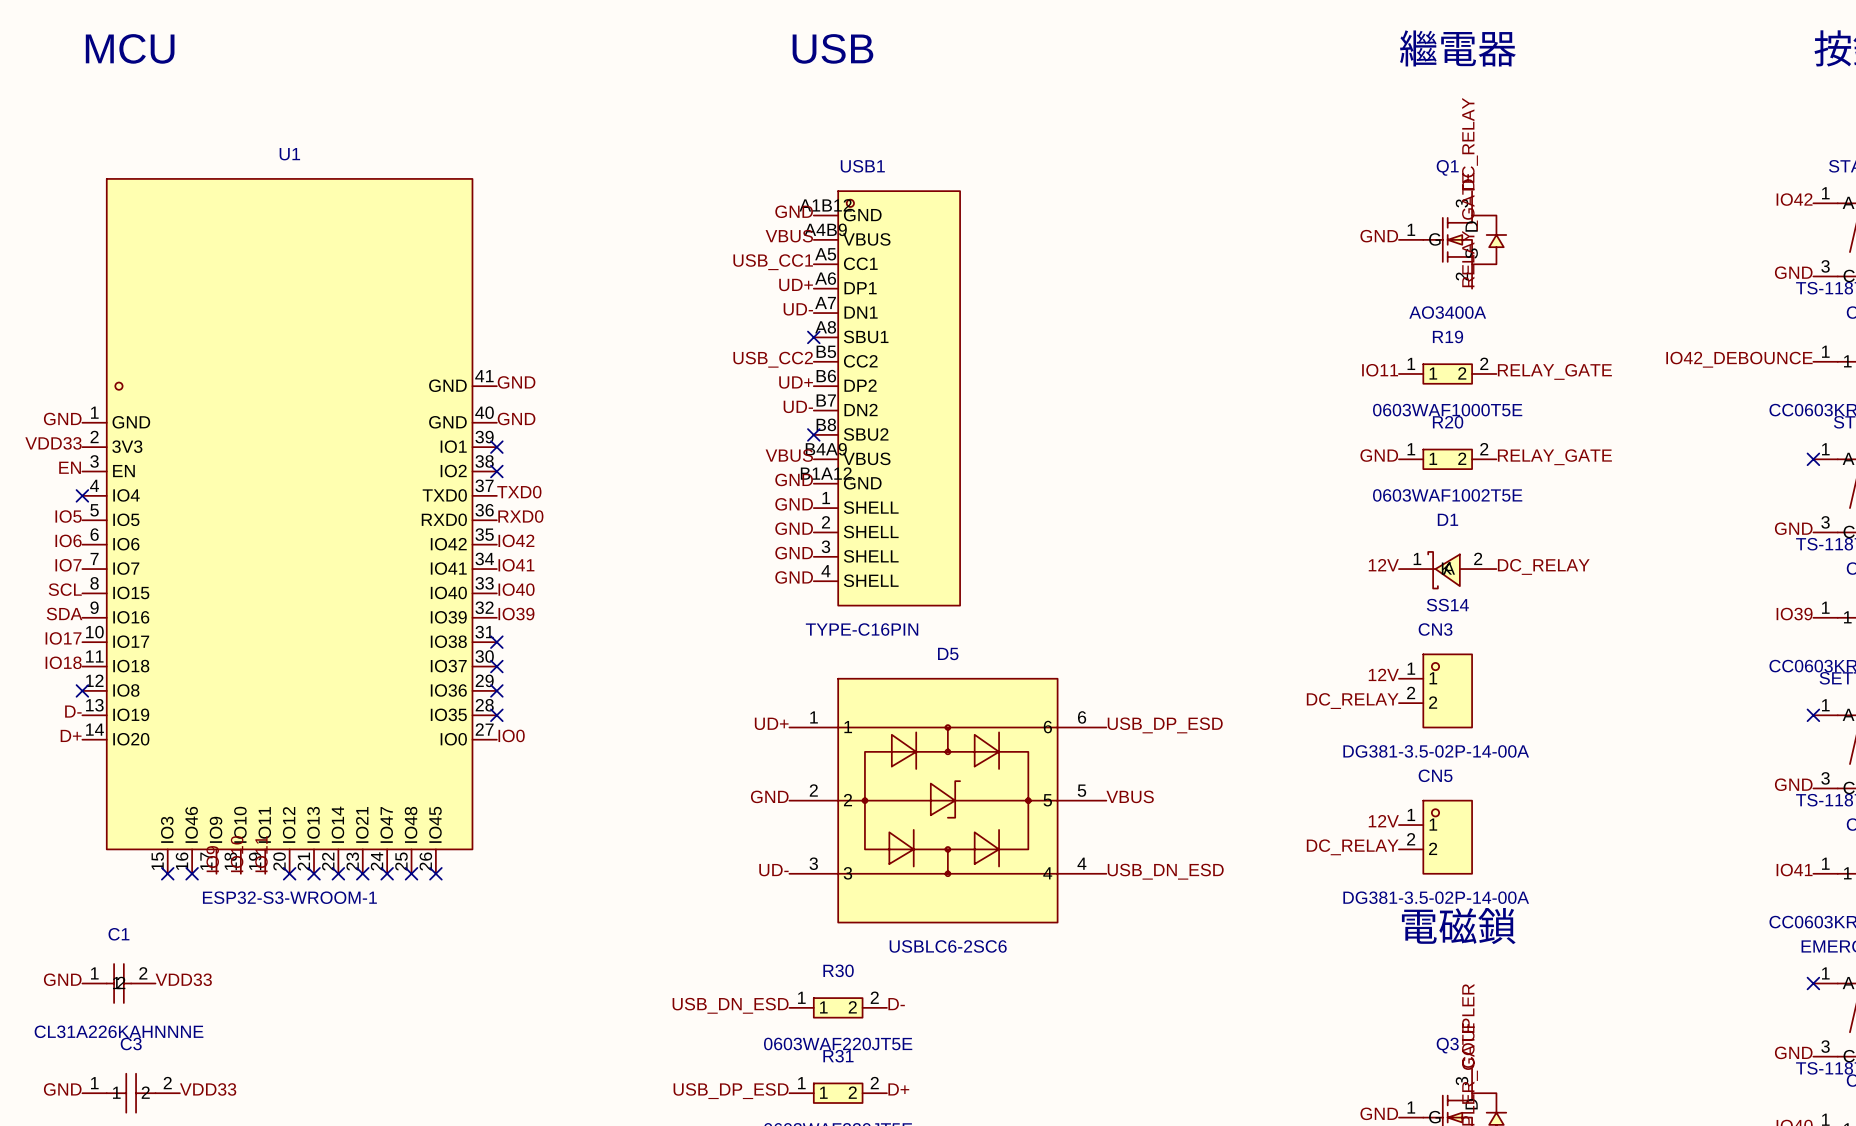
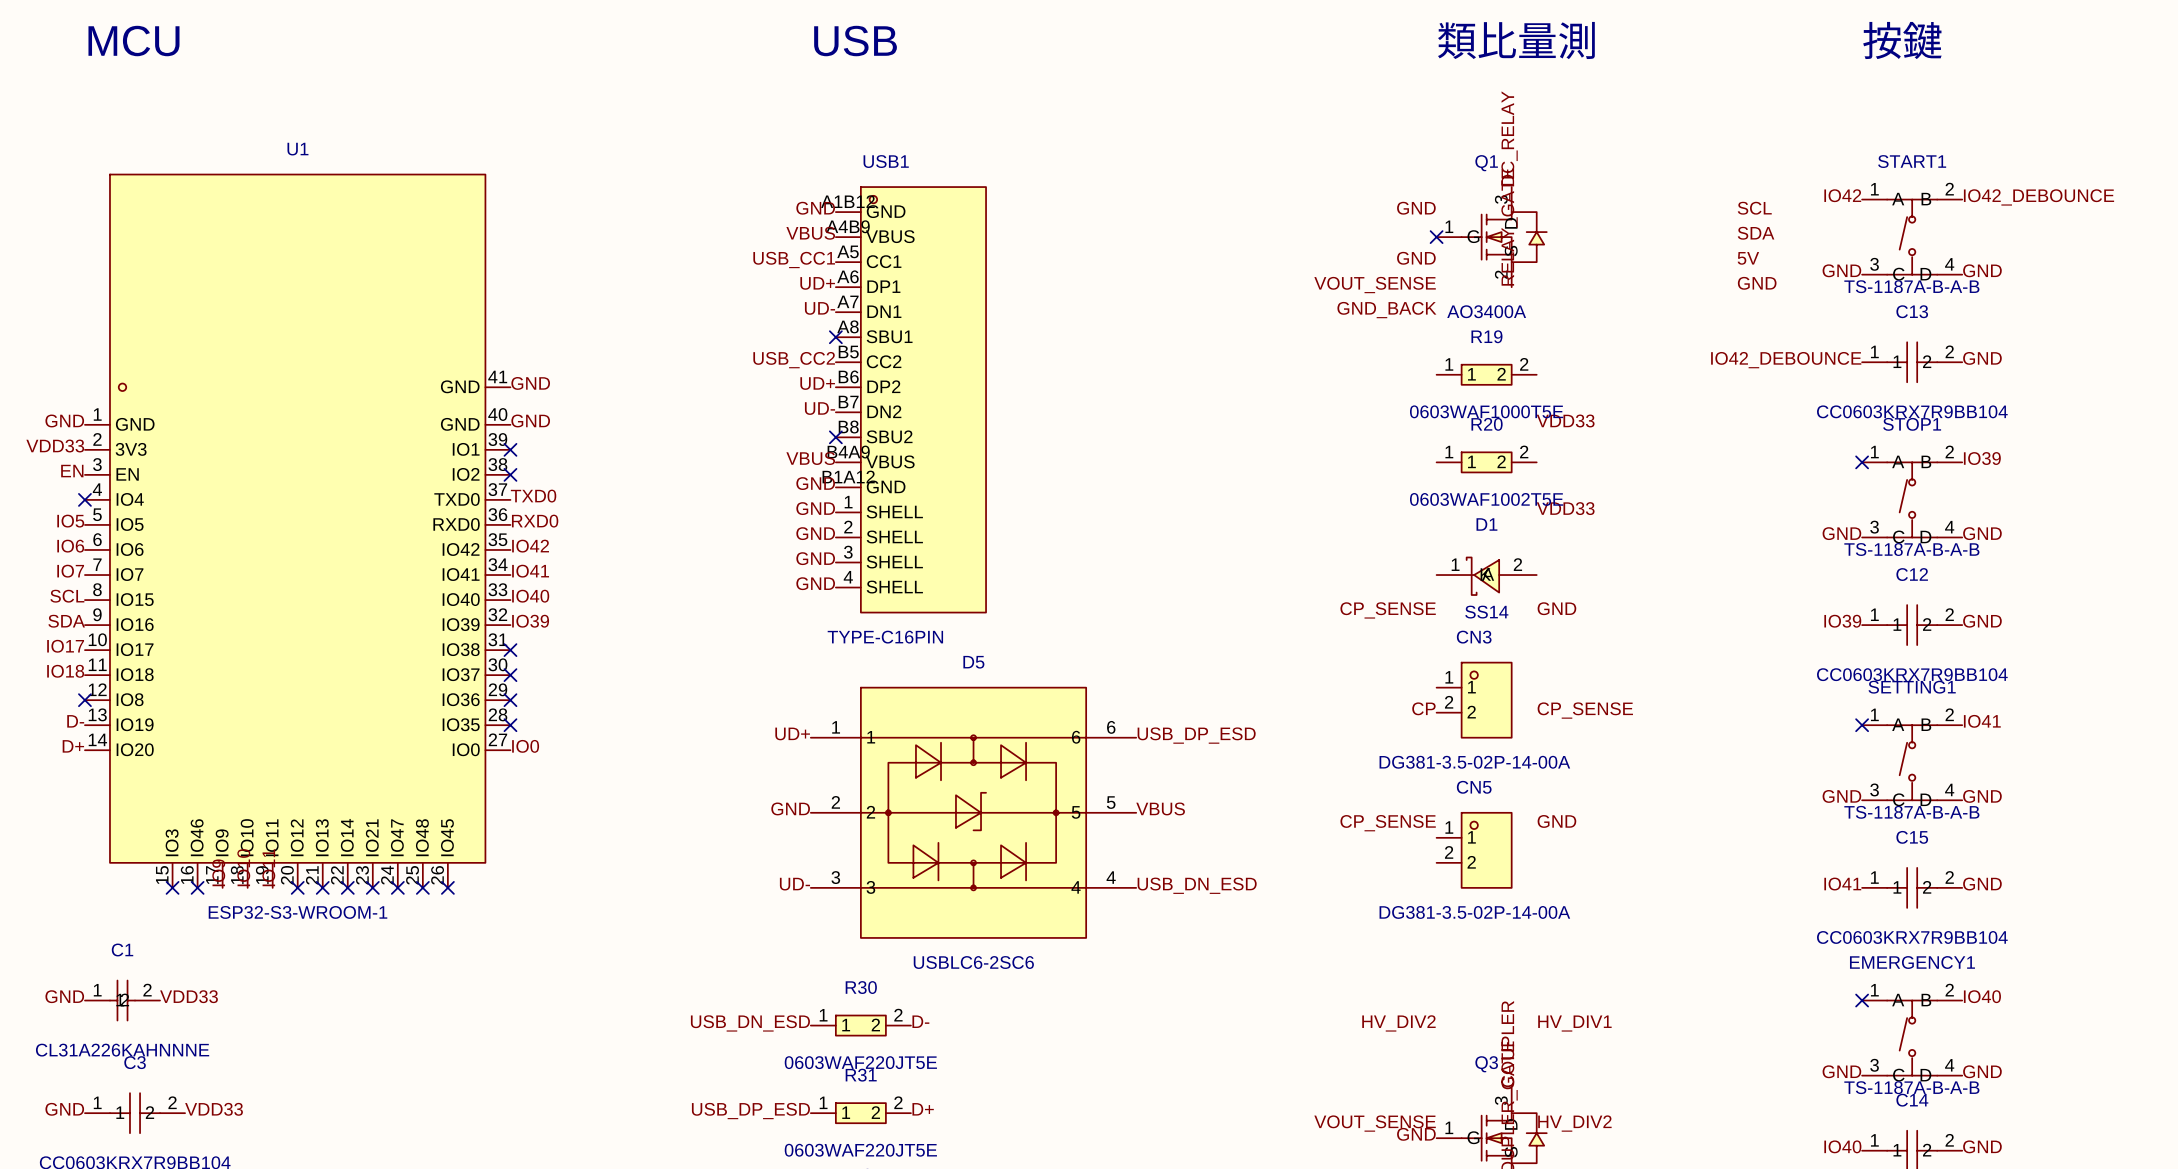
text: 繼電器 (1457, 48) -> 類比量測 (1516, 40)
label: none -> GND (1416, 208)
label: none -> SCL (1754, 208)
label: GND (1379, 236) -> none
label: none -> SDA (1756, 233)
no-connect mark: none -> (1436, 237)
label: none -> GND (1416, 258)
label: none -> 5V (1748, 258)
label: none -> GND (1757, 283)
label: none -> VOUT_SENSE (1375, 285)
label: none -> GND_BACK (1386, 310)
label: IO11 (1380, 370) -> none
label: RELAY_GATE (1554, 371) -> none
label: none -> VDD33 (1565, 420)
label: GND (1379, 455) -> none
label: RELAY_GATE (1554, 457) -> none
label: none -> VDD33 (1565, 508)
label: 12V (1383, 565) -> none
label: DC_RELAY (1543, 566) -> none
label: none -> GND (1556, 608)
label: none -> CP_SENSE (1388, 610)
label: 12V (1383, 674) -> none
label: DC_RELAY (1352, 701) -> CP (1423, 708)
label: none -> CP_SENSE (1585, 710)
label: none -> GND (1556, 821)
label: none -> CP_SENSE (1388, 823)
label: 12V (1383, 821) -> none
label: DC_RELAY (1352, 847) -> none
text: 電磁鎖 (1458, 926) -> none
label: none -> HV_DIV2 (1398, 1023)
label: none -> HV_DIV1 (1574, 1023)
label: none -> VOUT_SENSE (1375, 1123)
label: none -> HV_DIV2 (1574, 1123)

